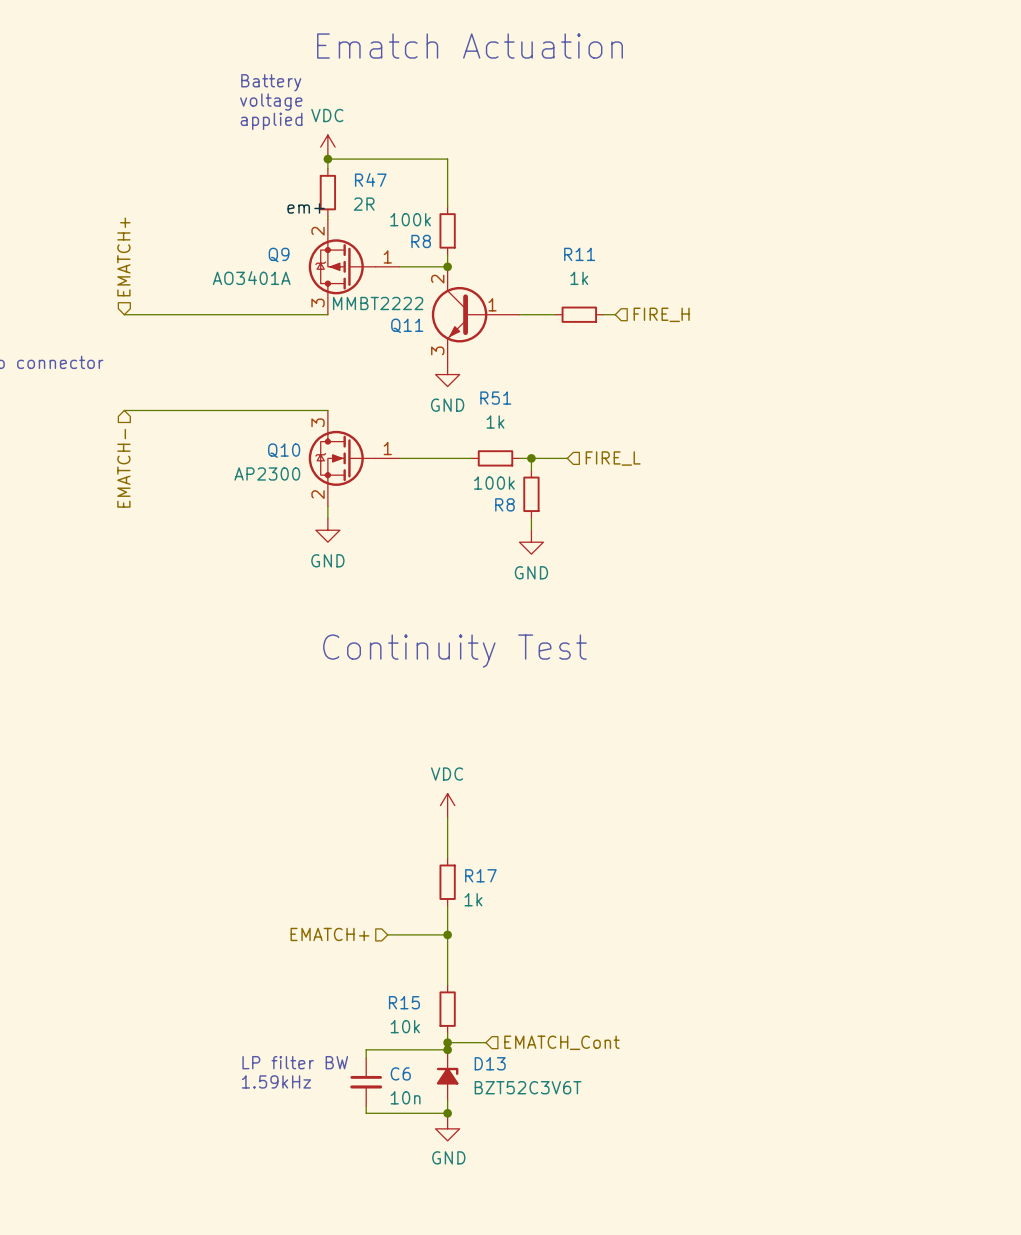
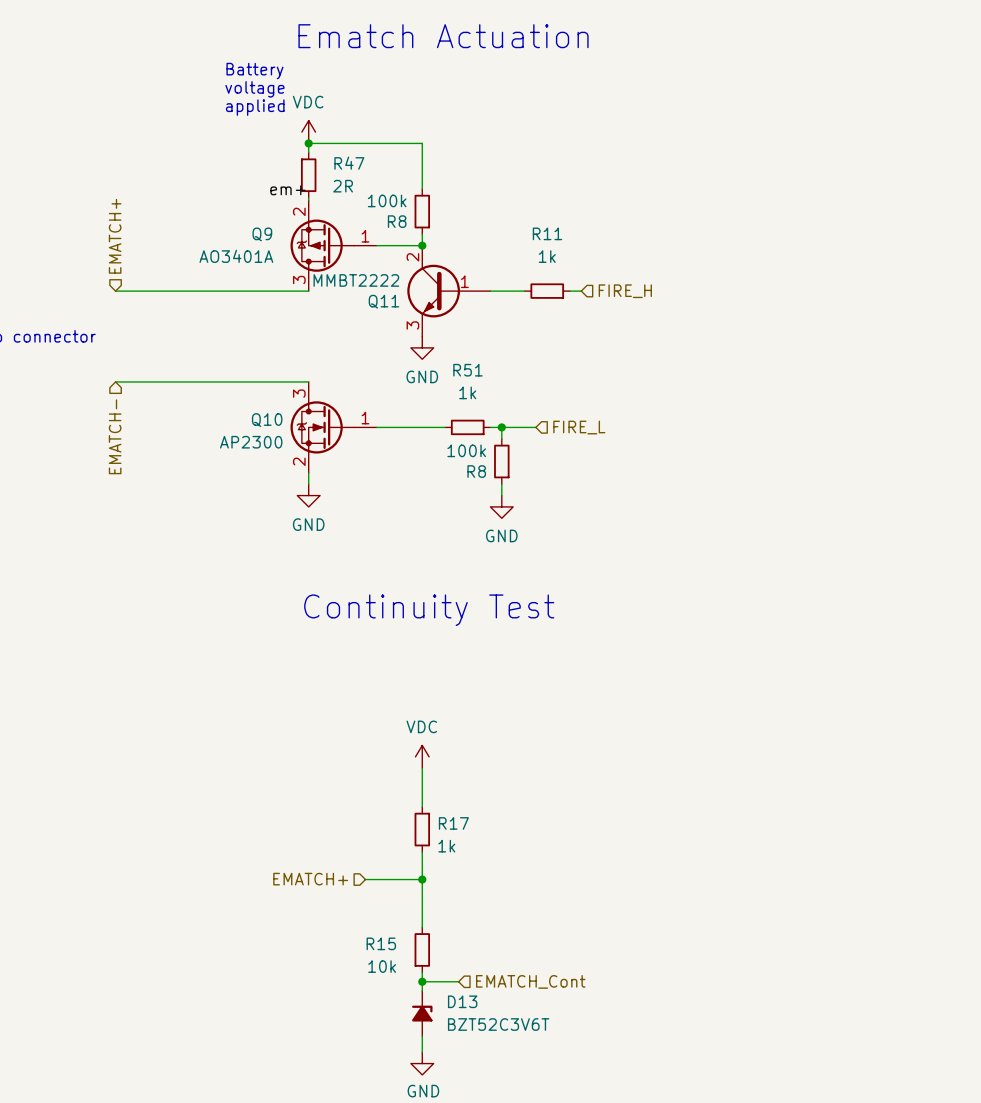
wire: (447, 1049) (366, 1049) (366, 1058) -> none
junction: (447, 1049) -> none
text: LP filter BW (295, 1062) -> none
text: 1.59kHz (276, 1081) -> none
C6: 10n (366, 1082) -> none
wire: (366, 1106) (366, 1113) (447, 1113) -> none
junction: (447, 1113) -> none

